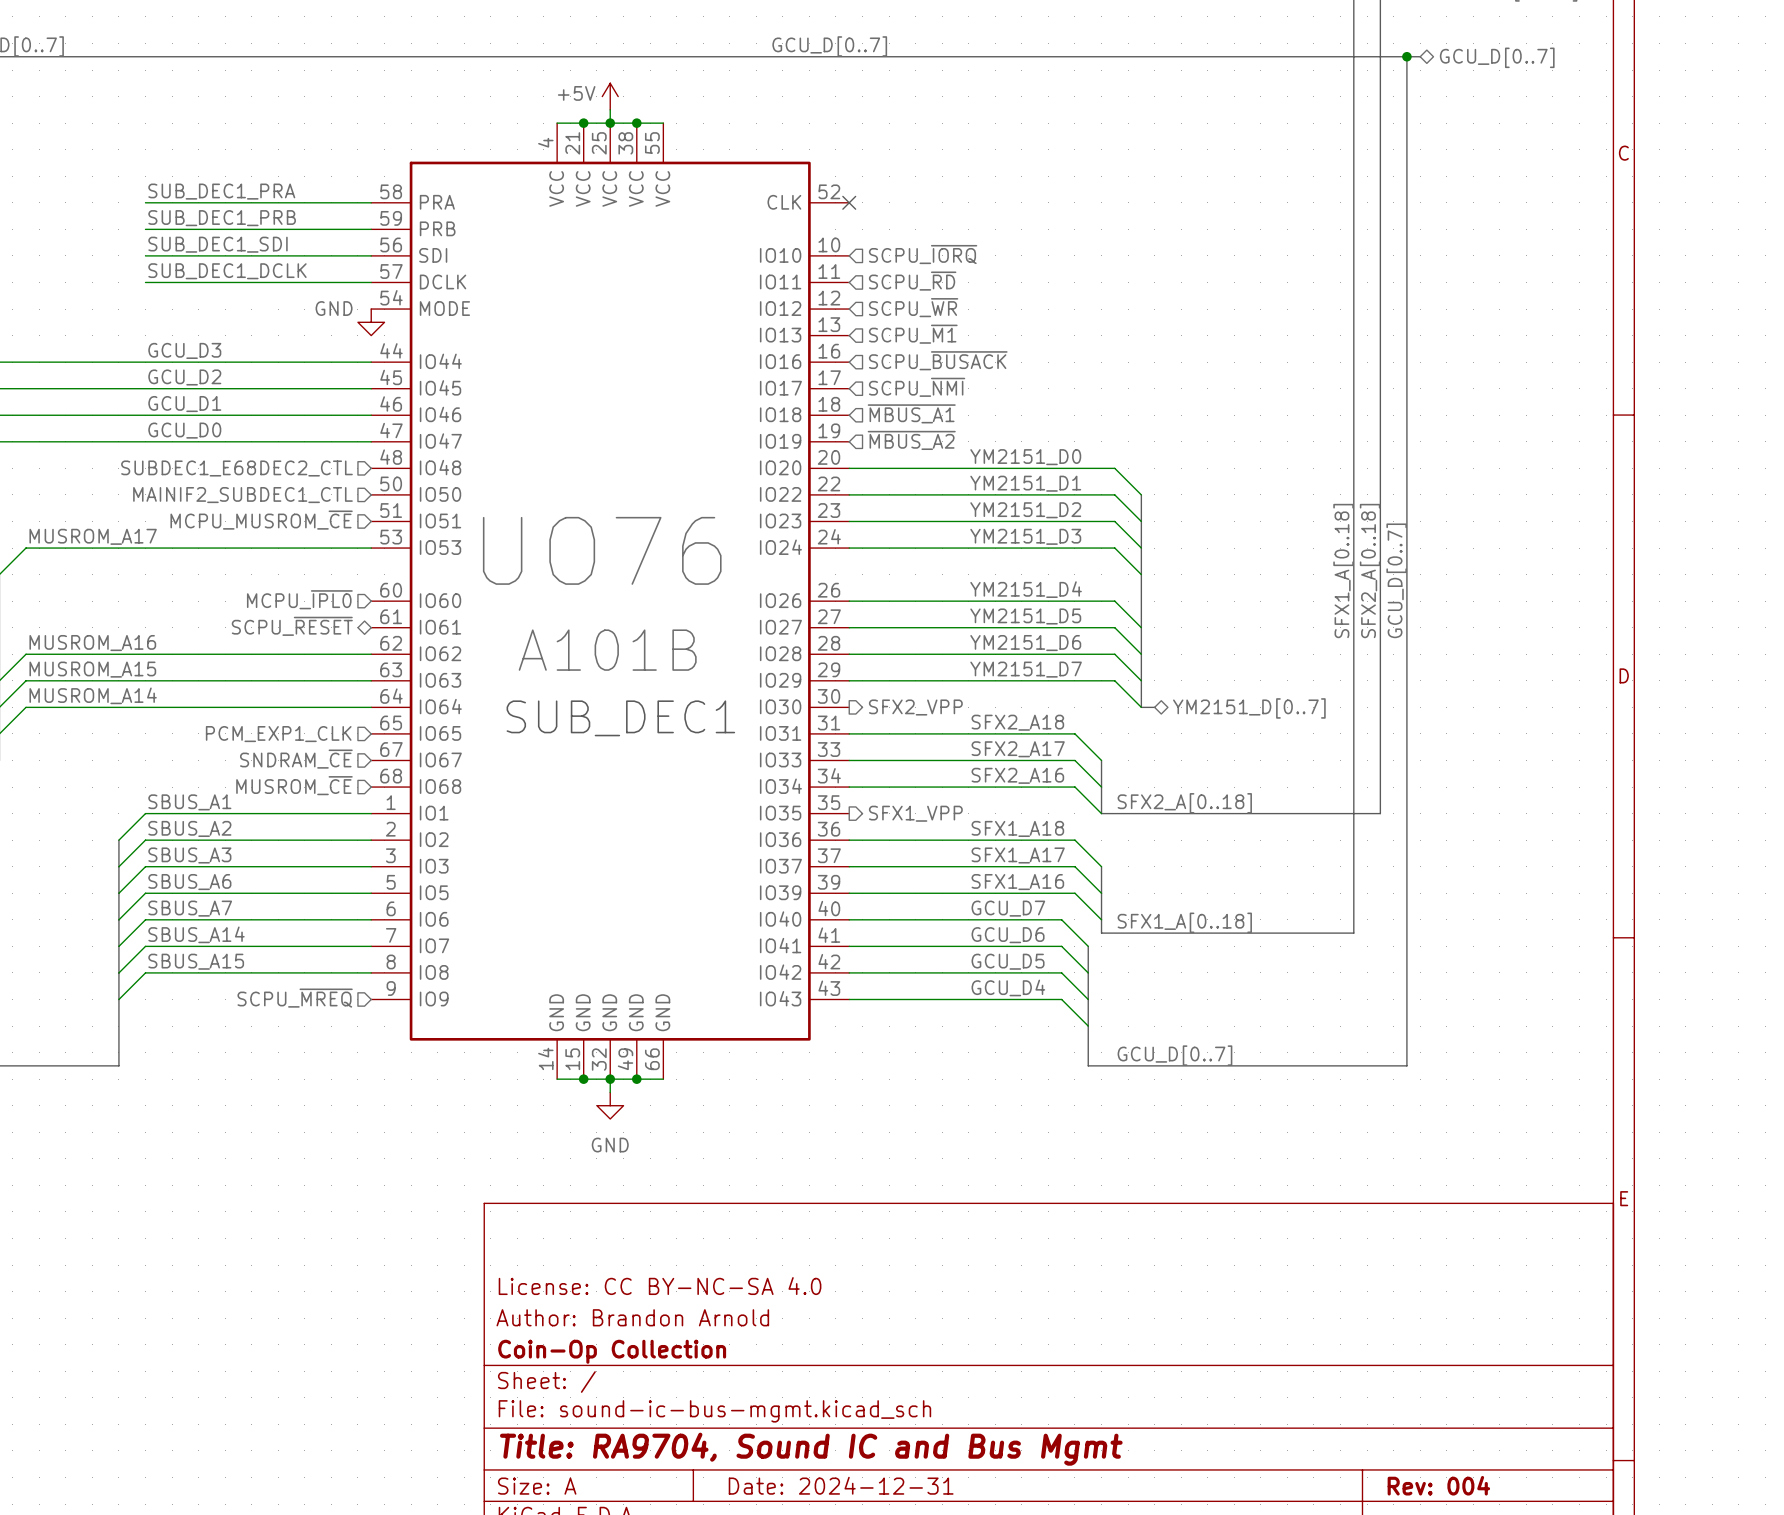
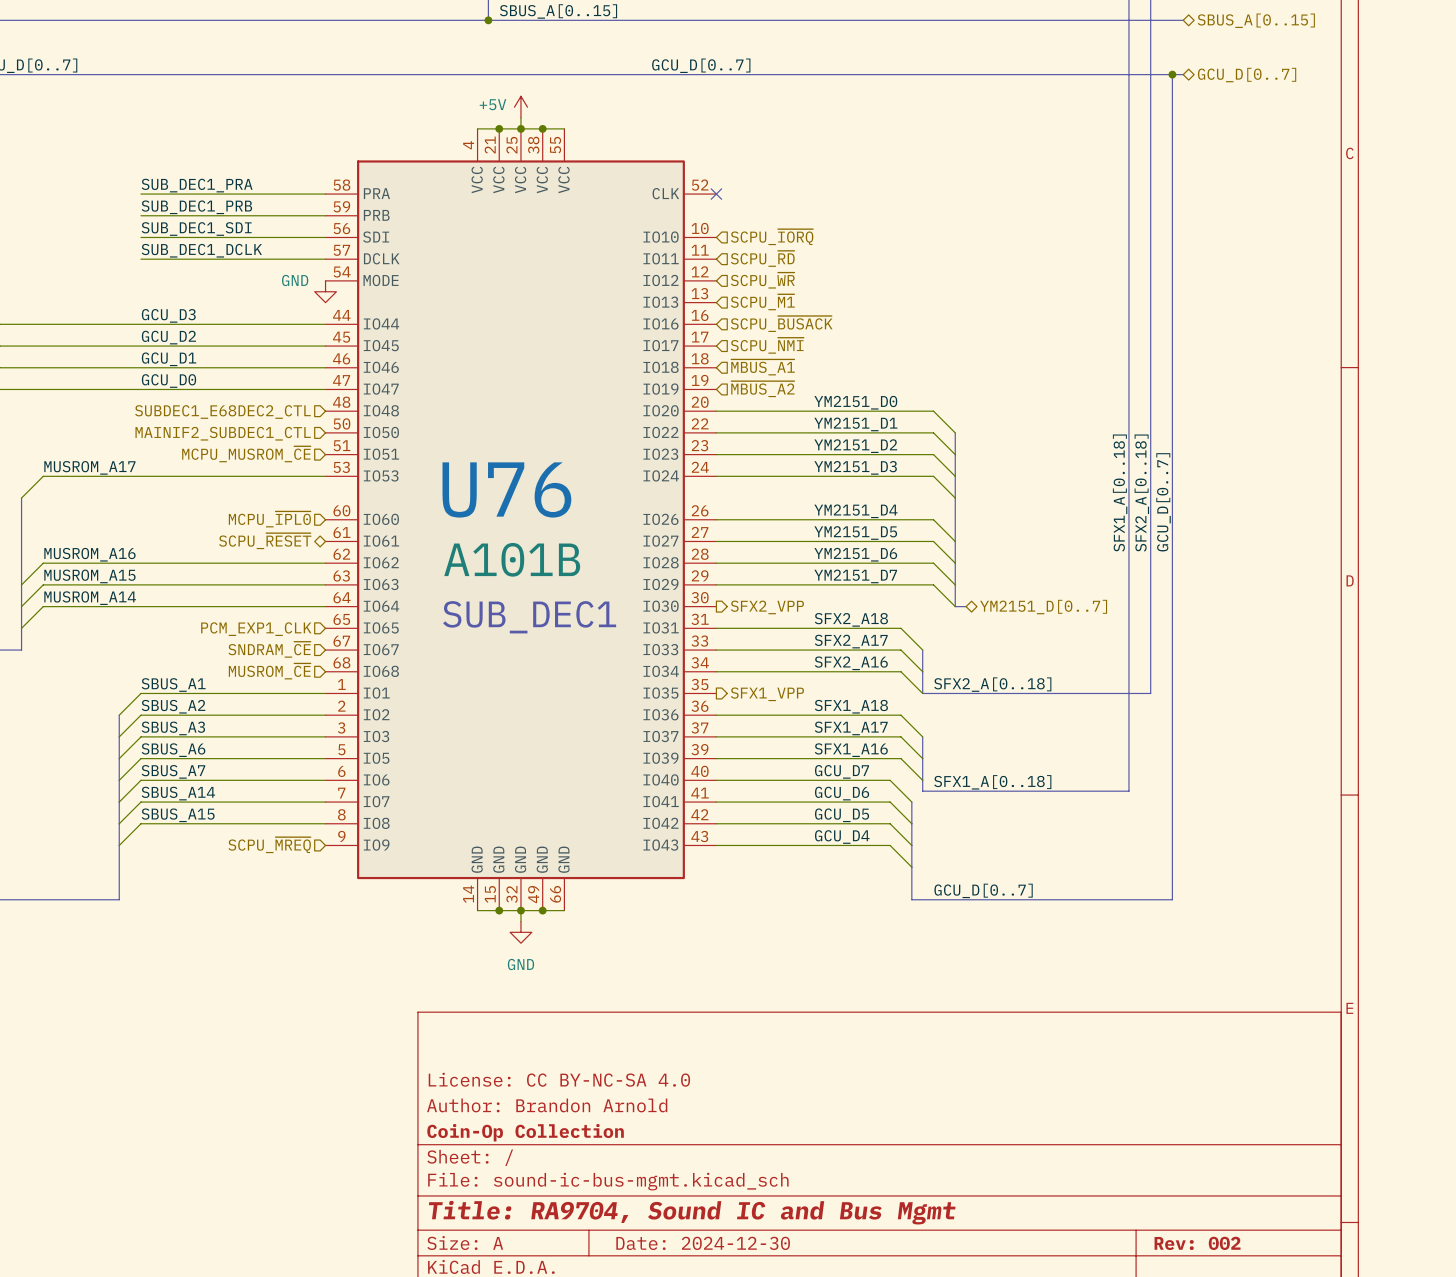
UO76 name: UO76 (602, 550) -> U76 (506, 489)
title block: Date: 2024-12-31 (841, 1485) -> Date: 2024-12-30 (703, 1243)
title block: Rev: 004 (1438, 1485) -> Rev: 002 (1197, 1243)

